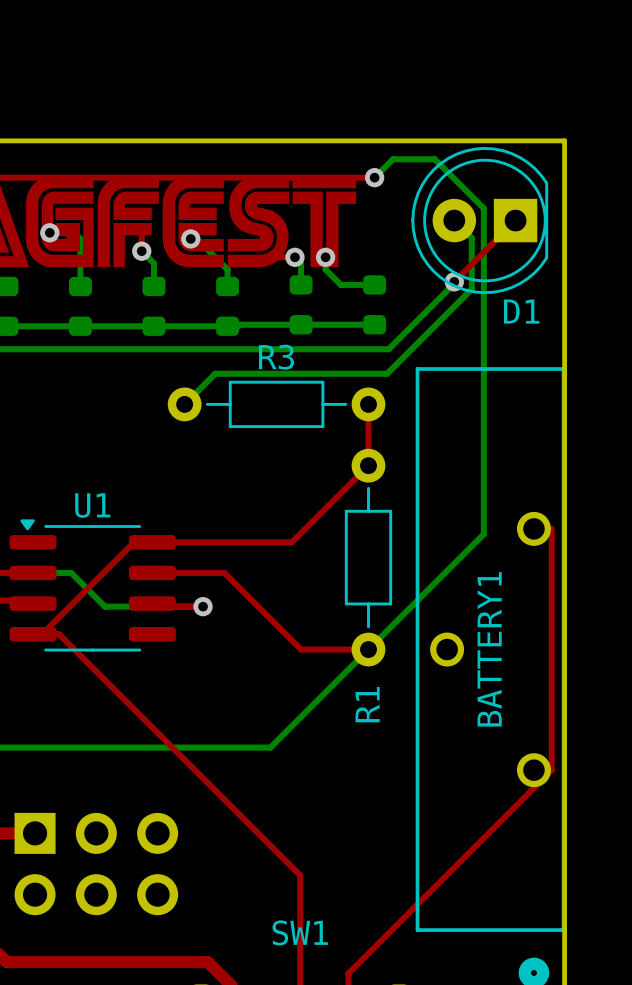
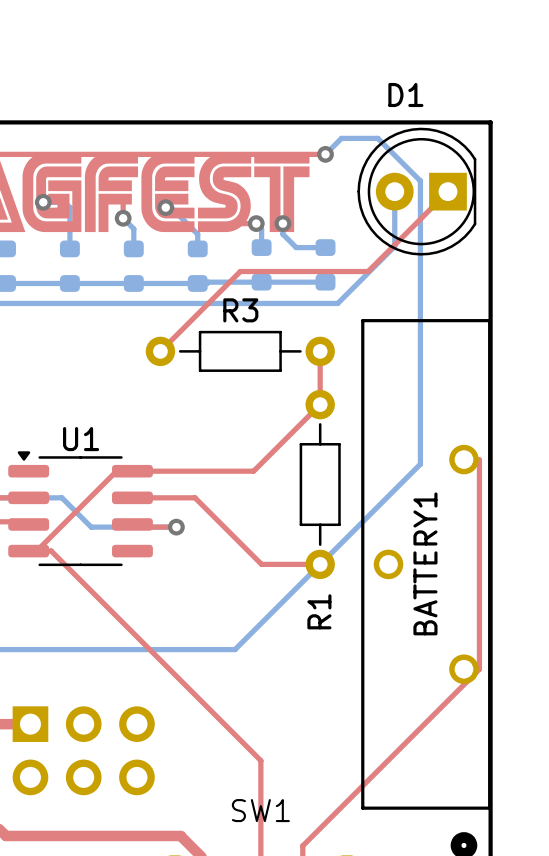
bottom track: (454, 220) (471, 238) (471, 289) (387, 373) (215, 373) (184, 404) -> (394, 191) (394, 244)
top track: none -> (394, 244) (368, 271) (240, 271) (160, 351)
via: (454, 281) -> none
D1 name position: D1 (521, 311) -> D1 (405, 95)

